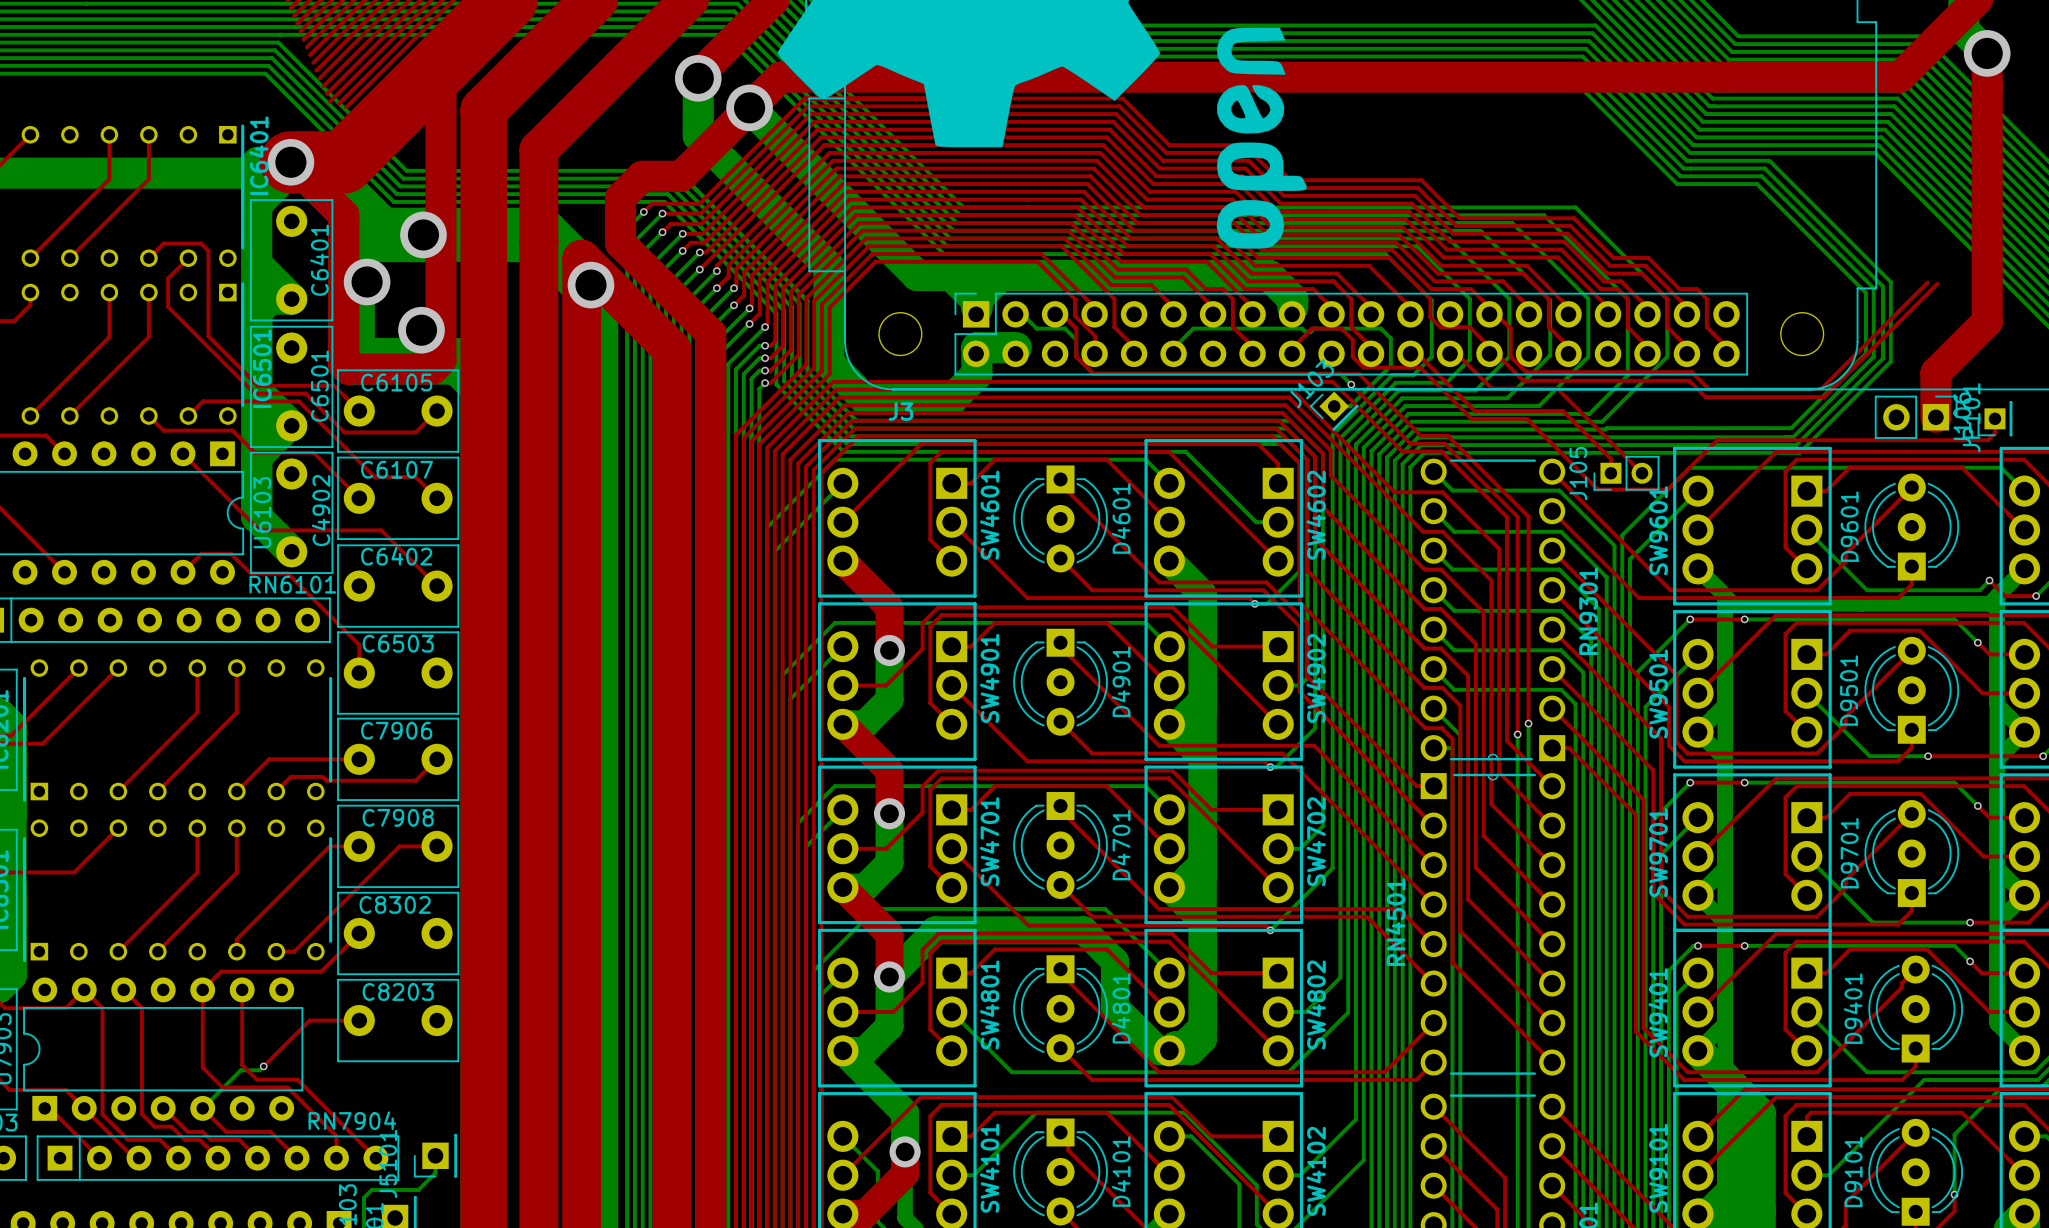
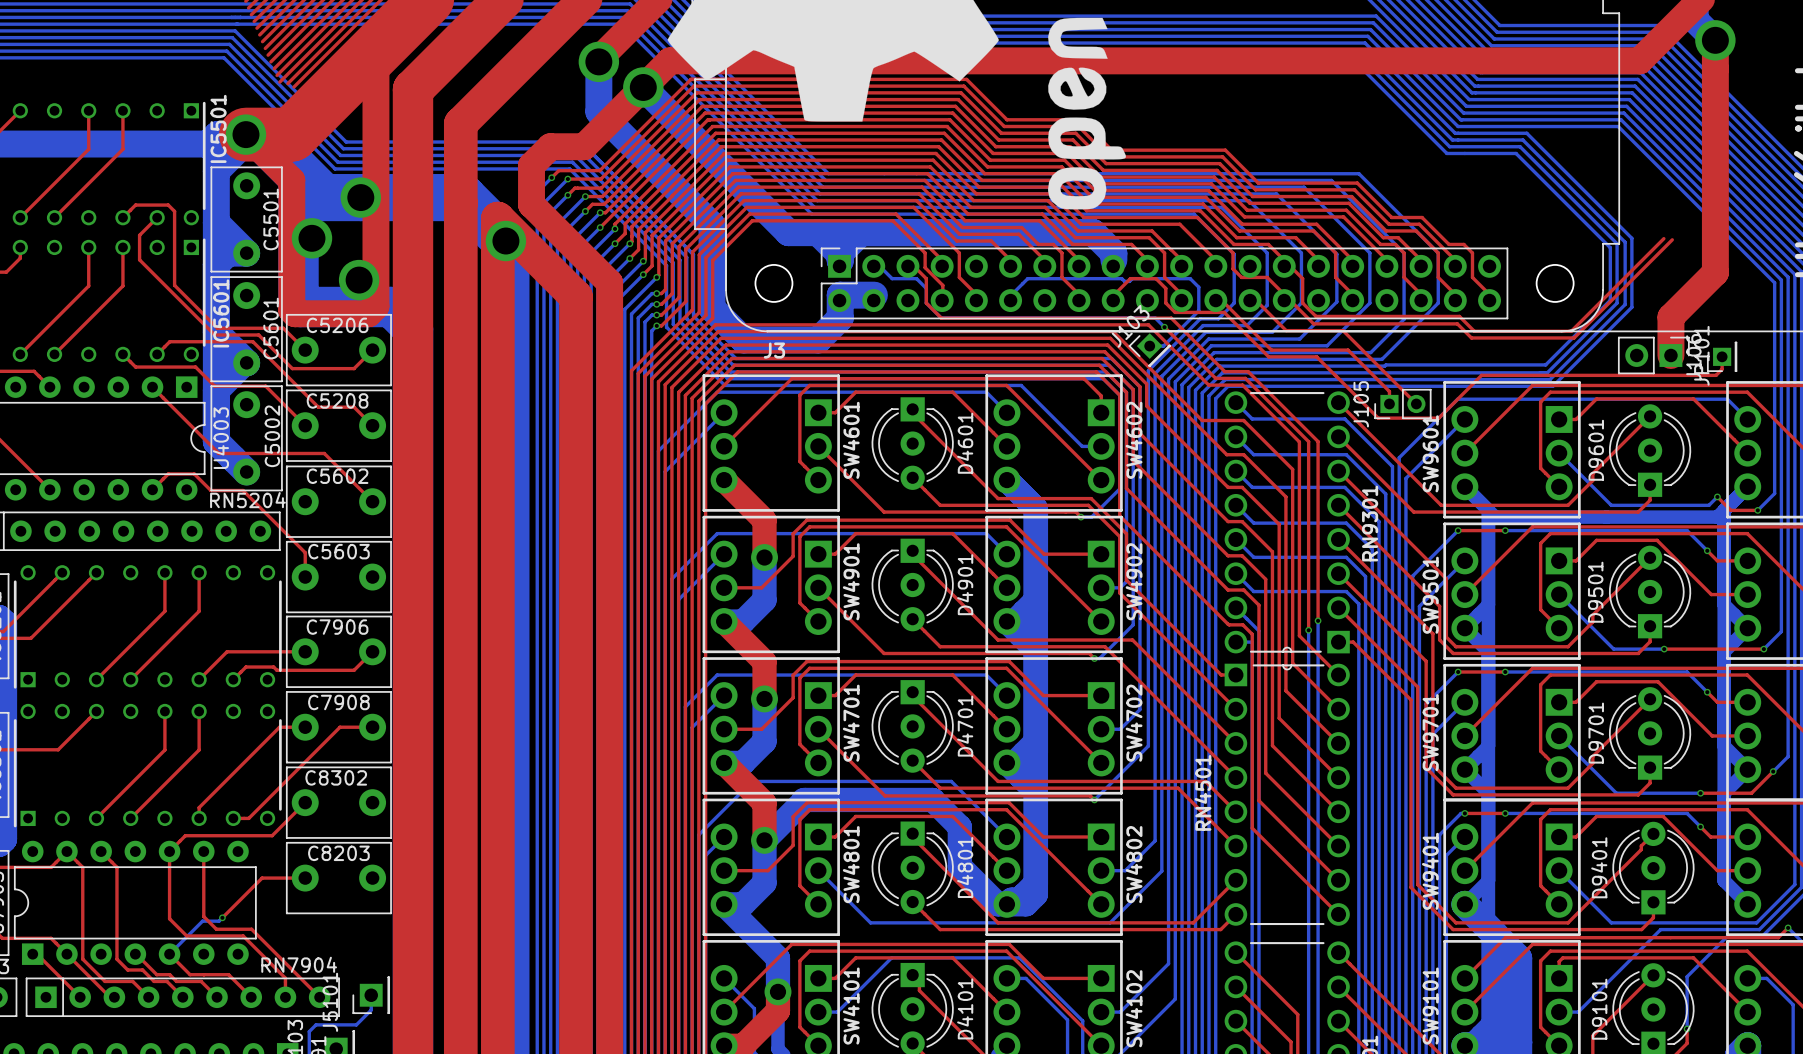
IC6401 name: IC6401 (258, 155) -> IC5501 (218, 128)
C6401 name: C6401 (319, 260) -> C5501 (271, 219)
IC6501 name: IC6501 (262, 368) -> IC5601 (221, 313)
C6105 name: C6105 (396, 382) -> C5206 (337, 325)
C6501 name: C6501 (319, 386) -> C5601 (271, 328)
C6107 name: C6107 (397, 469) -> C5208 (337, 400)
C4902 name: C4902 (321, 510) -> C5002 (272, 436)
U6103 name: U6103 (262, 512) -> U4003 (220, 438)
C6402 name: C6402 (396, 556) -> C5602 (337, 476)
RN6101 name: RN6101 (292, 584) -> RN5204 (247, 500)
C6503 name: C6503 (398, 643) -> C5603 (338, 551)

